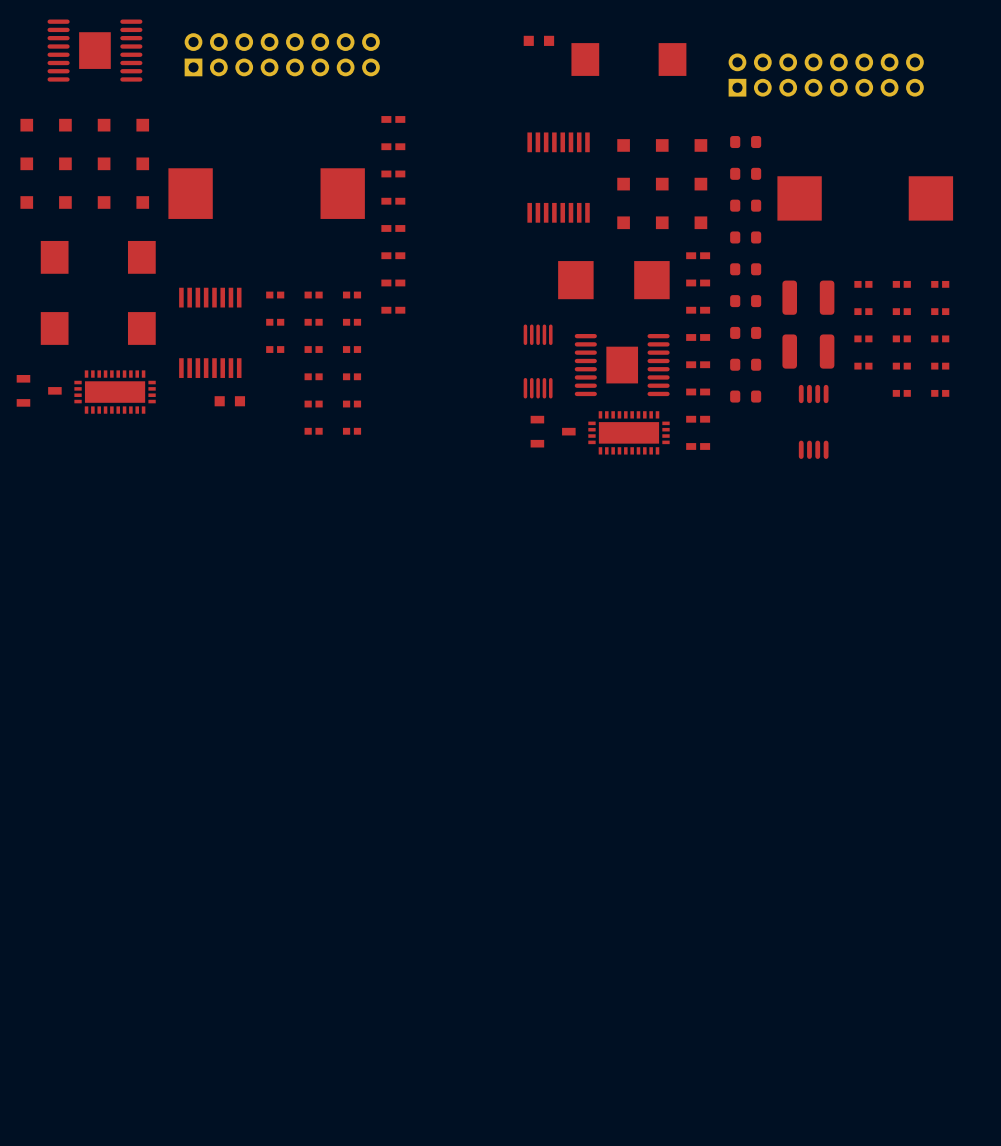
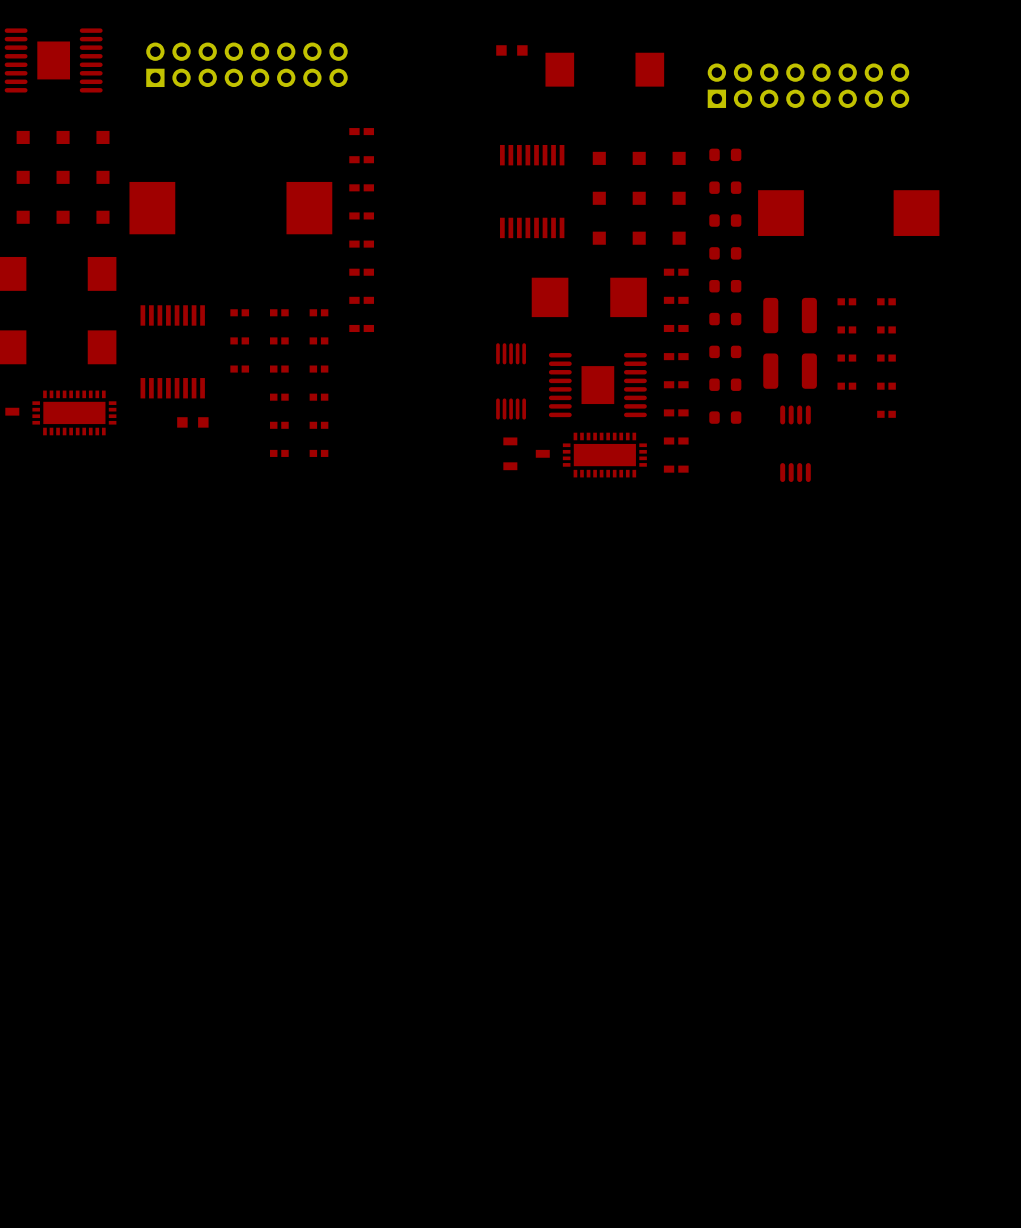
part: (940, 284) -> none
part: (940, 311) -> none
part: (940, 338) -> none
part: (940, 366) -> none
part: (940, 393) -> none

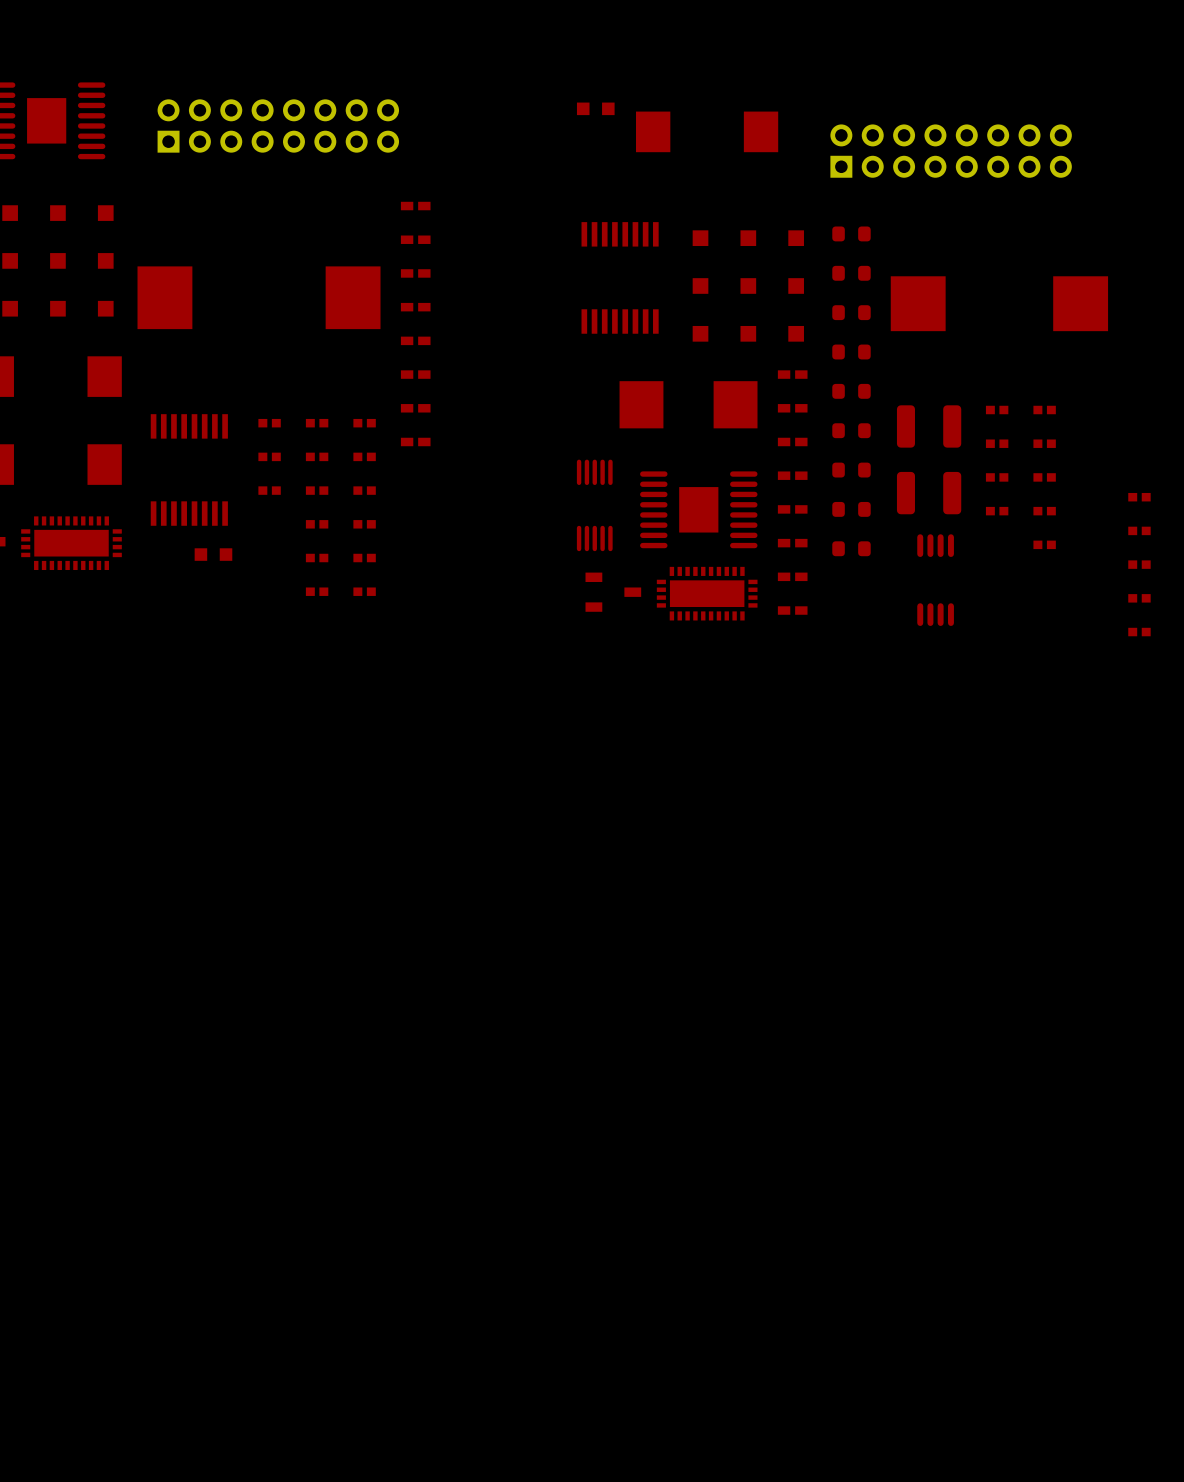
part: none -> (1139, 497)
part: none -> (1139, 530)
part: none -> (1139, 564)
part: none -> (1139, 598)
part: none -> (1139, 632)

